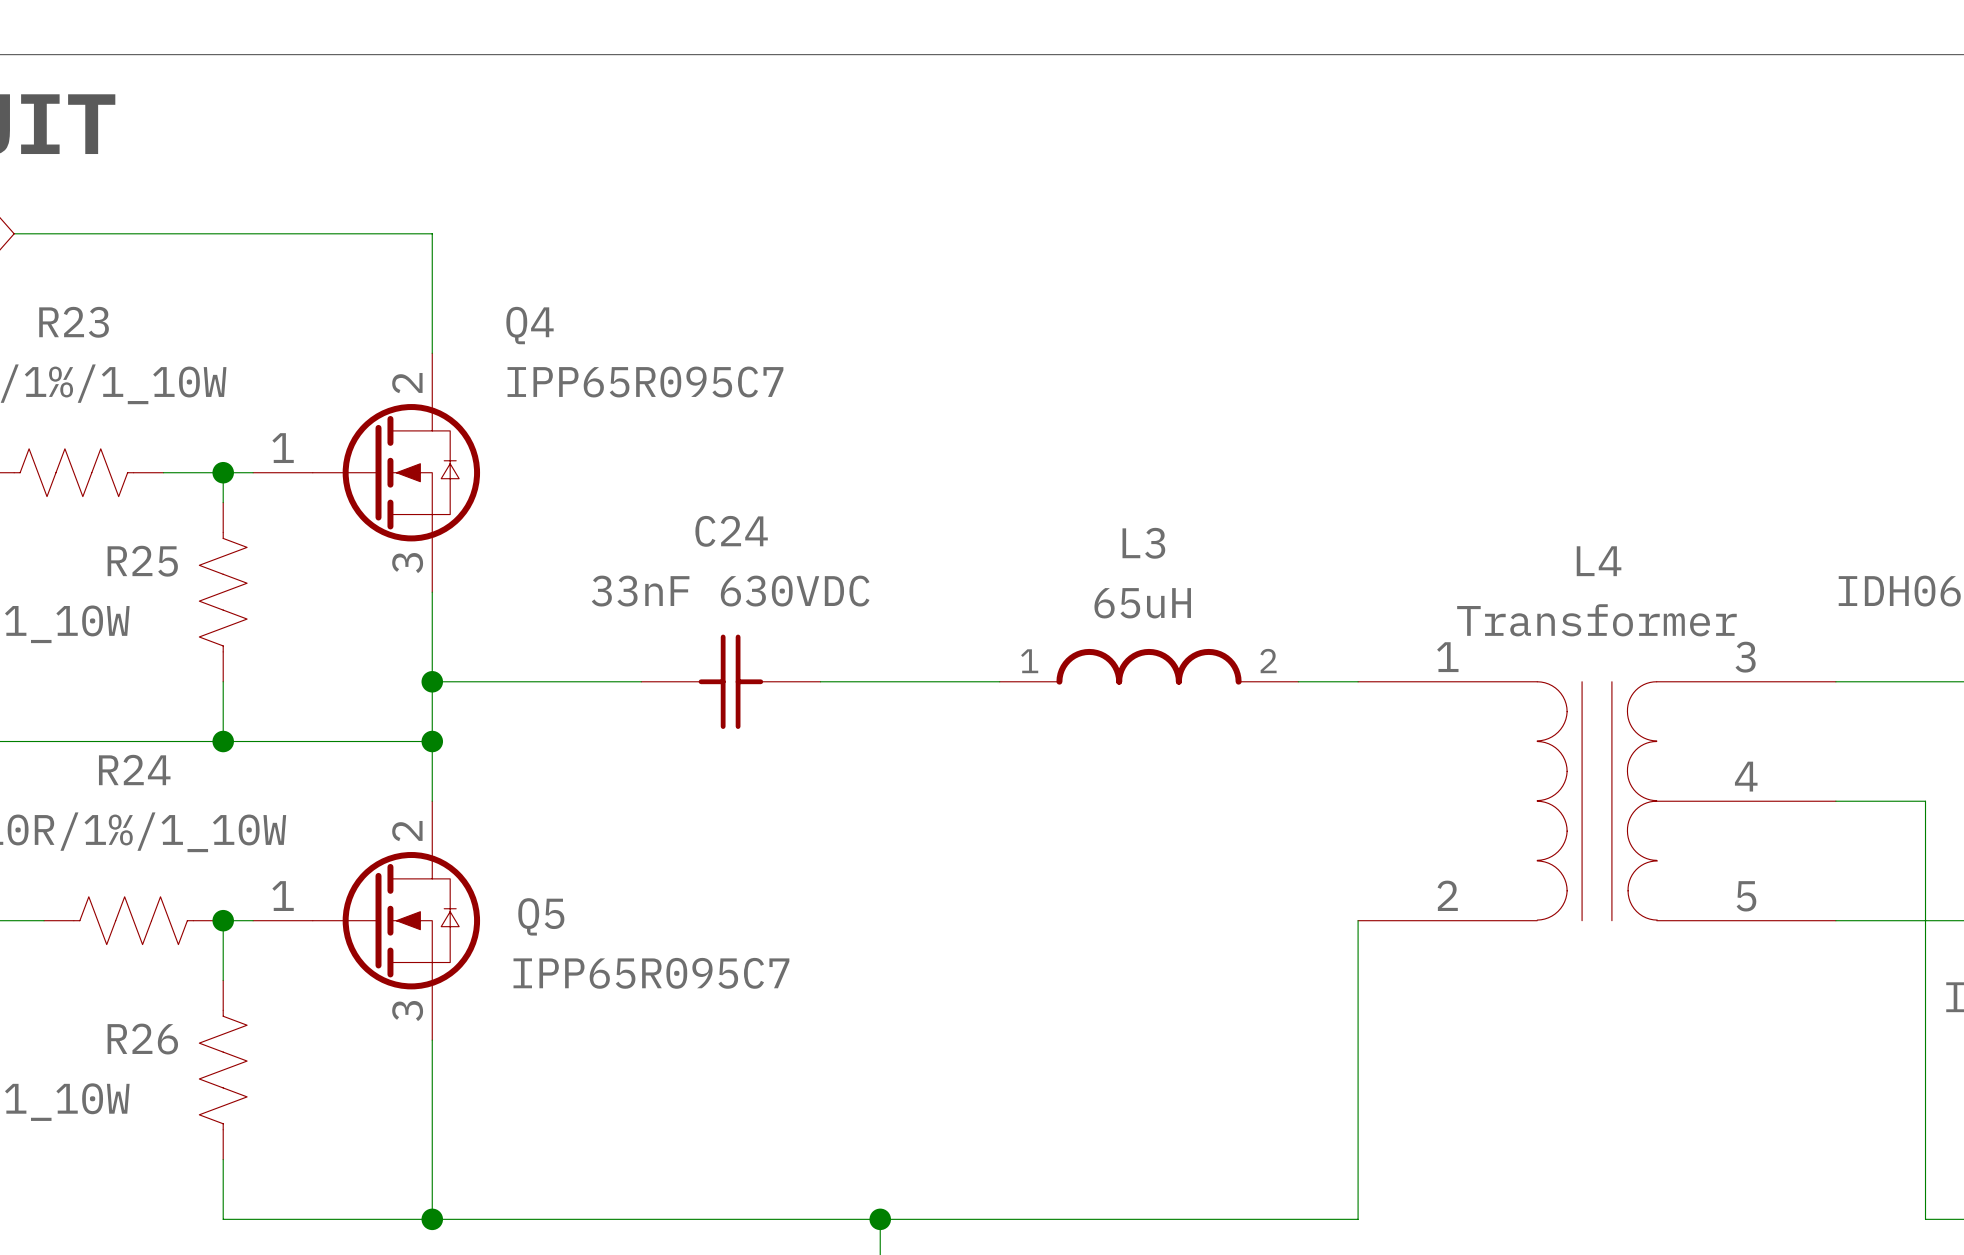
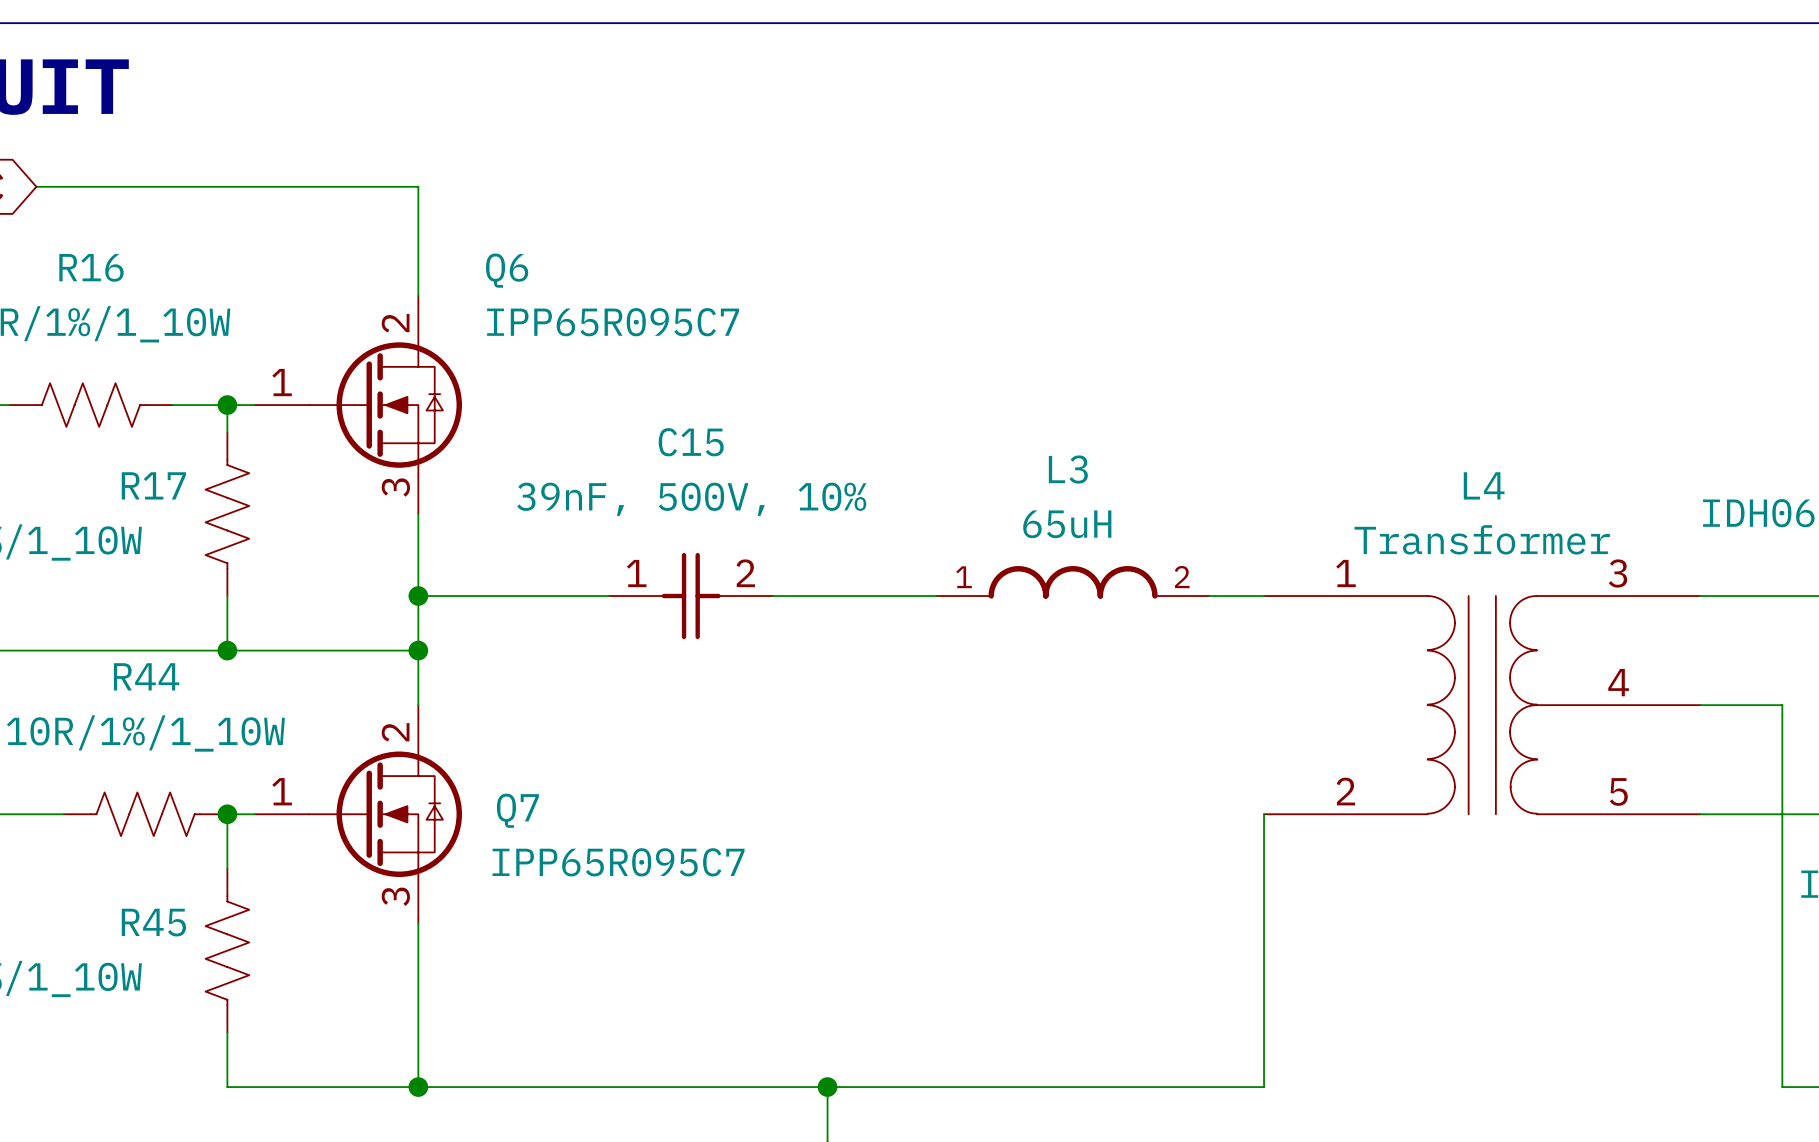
R23 name: R23 (74, 322) -> R16 (91, 267)
Q4 name: Q4 (530, 325) -> Q6 (507, 270)
C24 name: C24 (731, 531) -> C15 (691, 442)
R25 name: R25 (142, 561) -> R17 (153, 485)
C24 value: 33nF 630VDC (730, 591) -> 39nF, 500V, 10% (691, 499)
C24 pin number: none -> 2 (745, 573)
C24 pin number: none -> 1 (636, 573)
R24 name: R24 (134, 770) -> R44 (146, 676)
Q5 name: Q5 (541, 916) -> Q7 (517, 810)
R26 name: R26 (142, 1039) -> R45 (153, 922)

